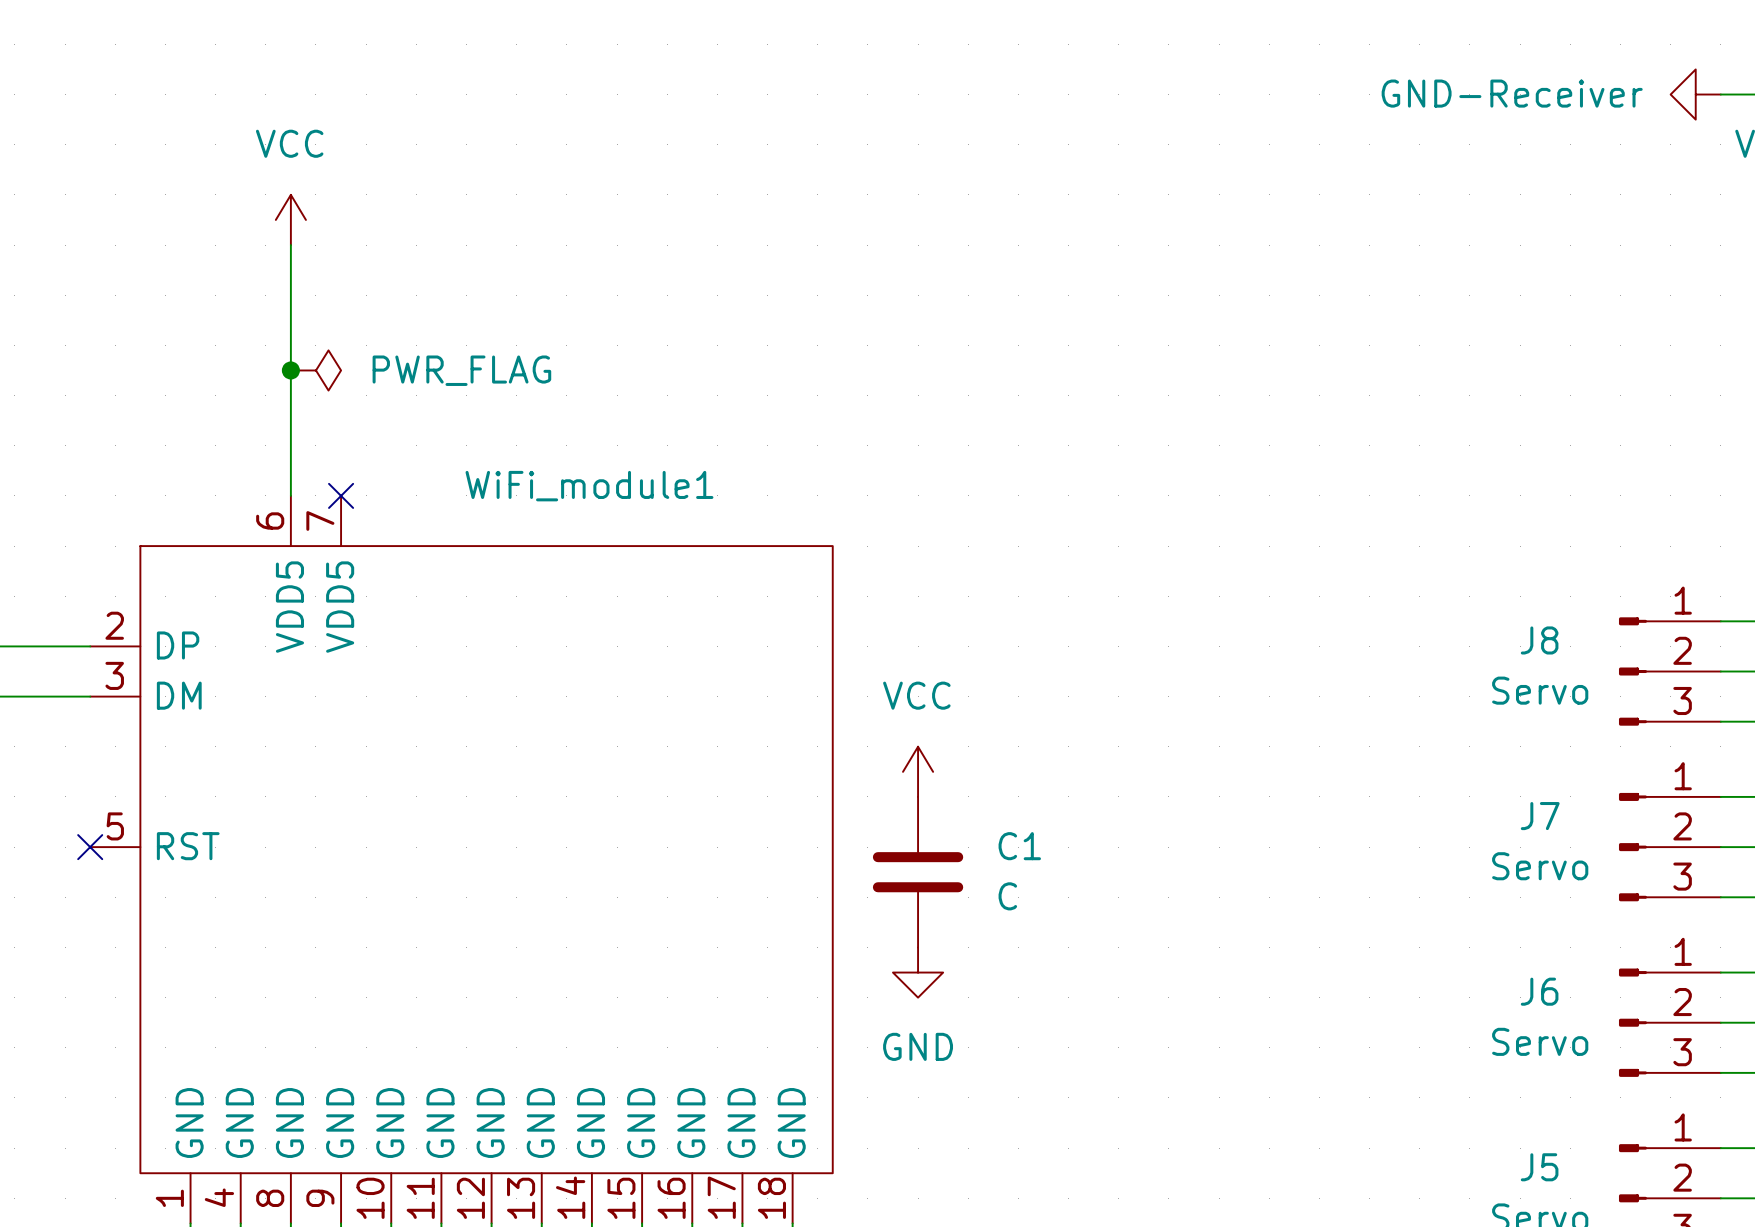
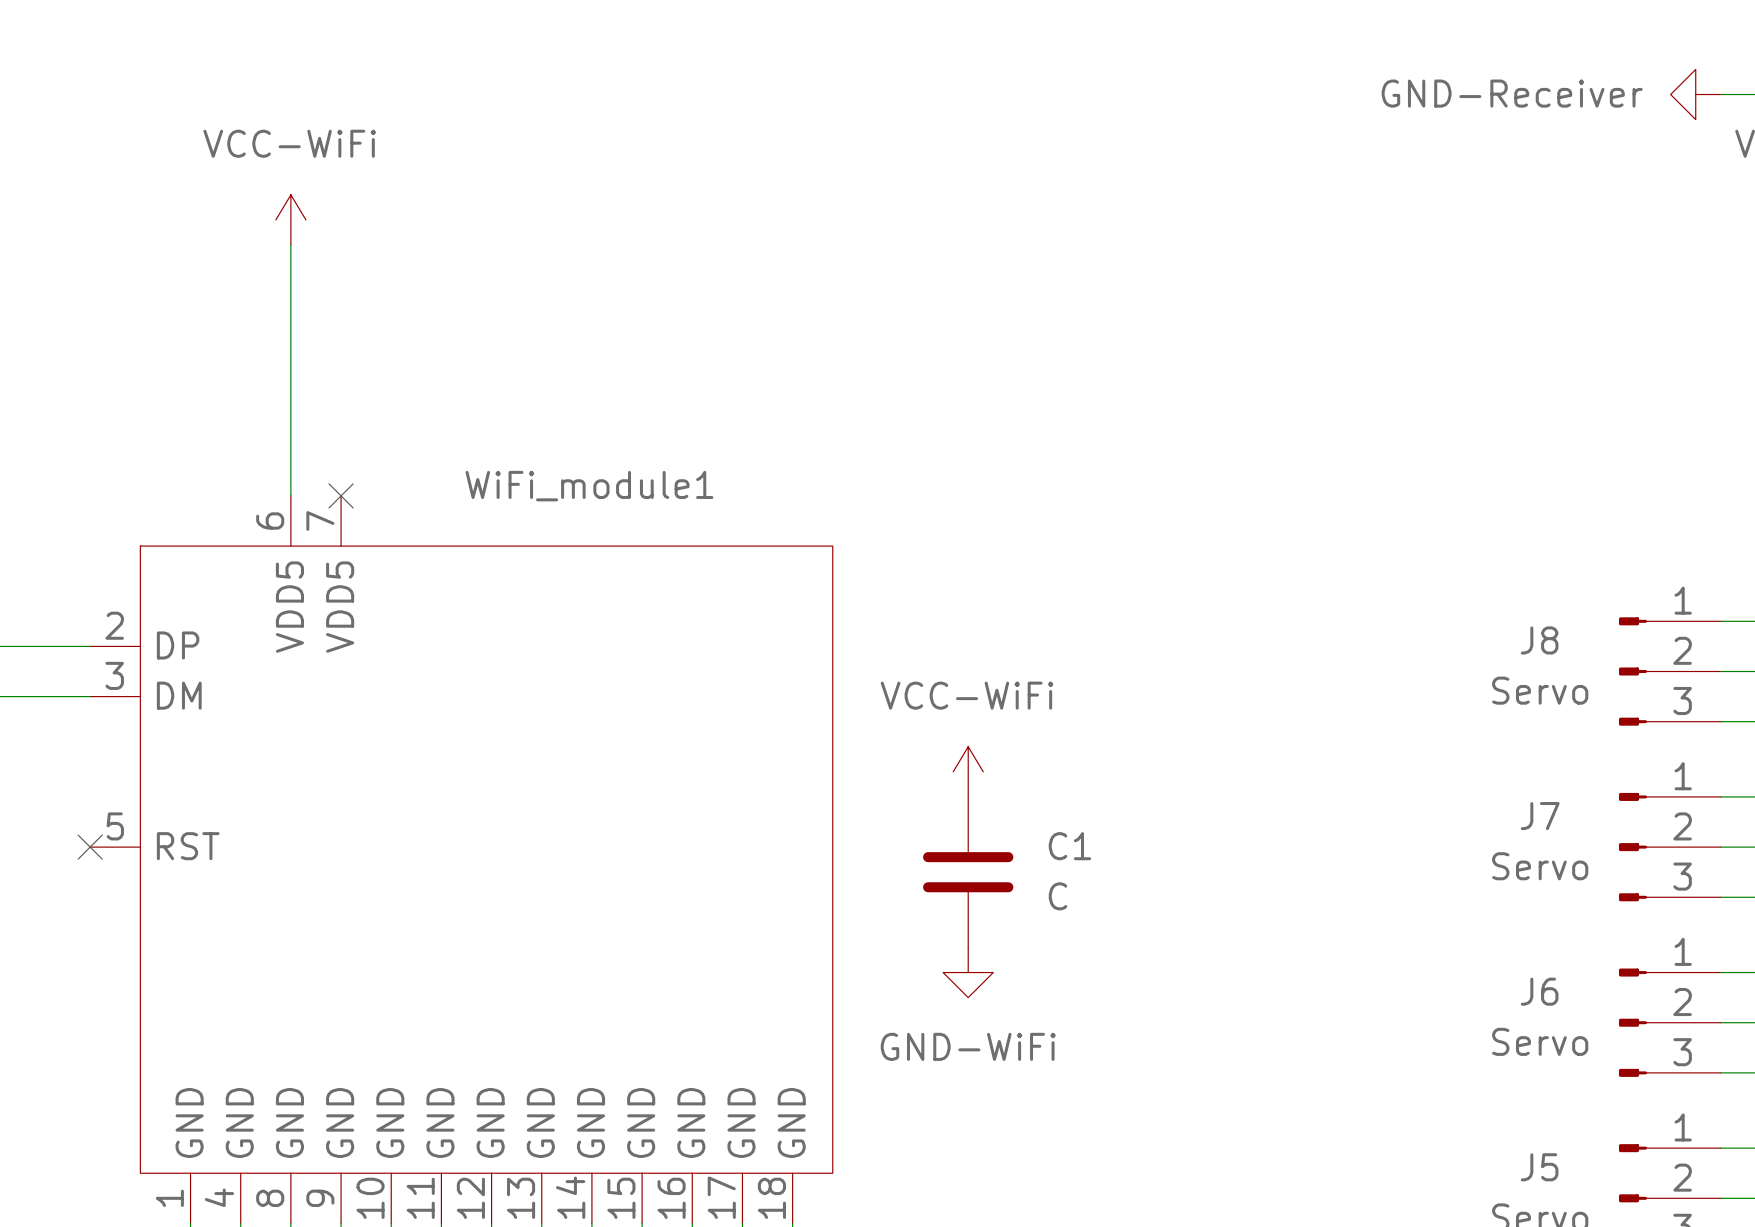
power symbol: VCC (290, 219) -> VCC-WiFi (290, 219)
junction: (290, 370) -> none
power symbol: PWR_FLAG (315, 370) -> none
power symbol: VCC (918, 771) -> none
power symbol: none -> VCC-WiFi (968, 771)
C1 position: (918, 872) -> (968, 872)
power symbol: GND (918, 972) -> none
power symbol: none -> GND-WiFi (968, 972)

